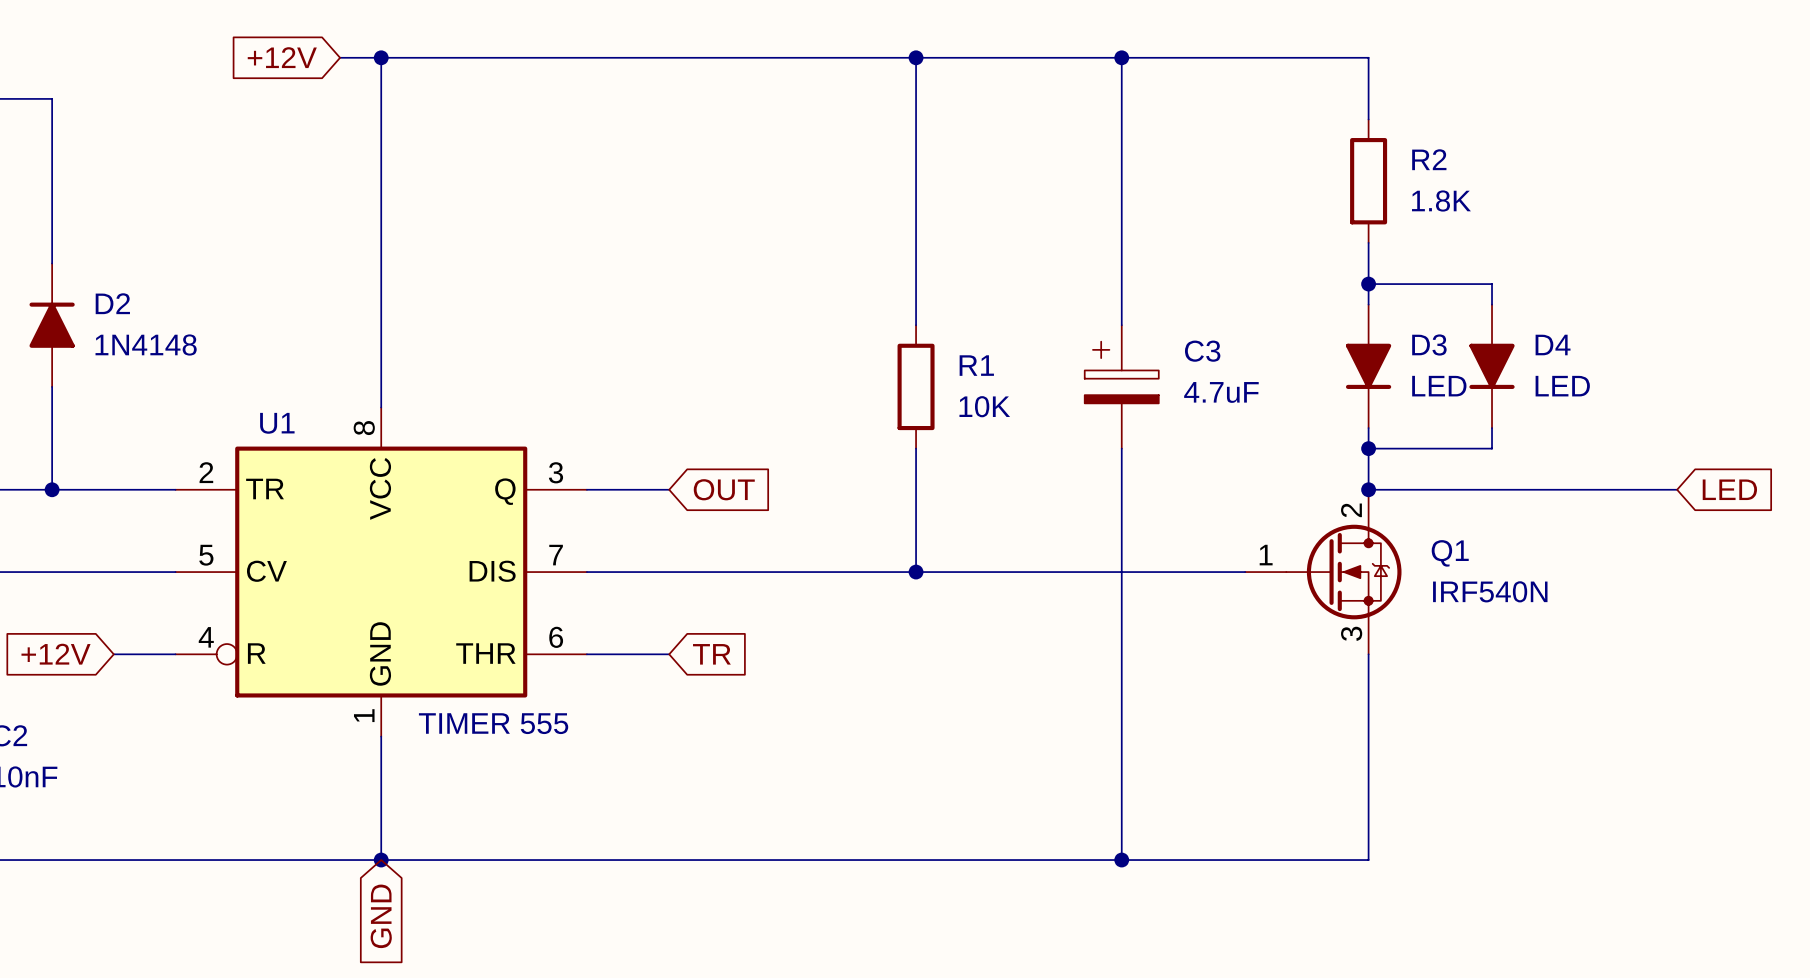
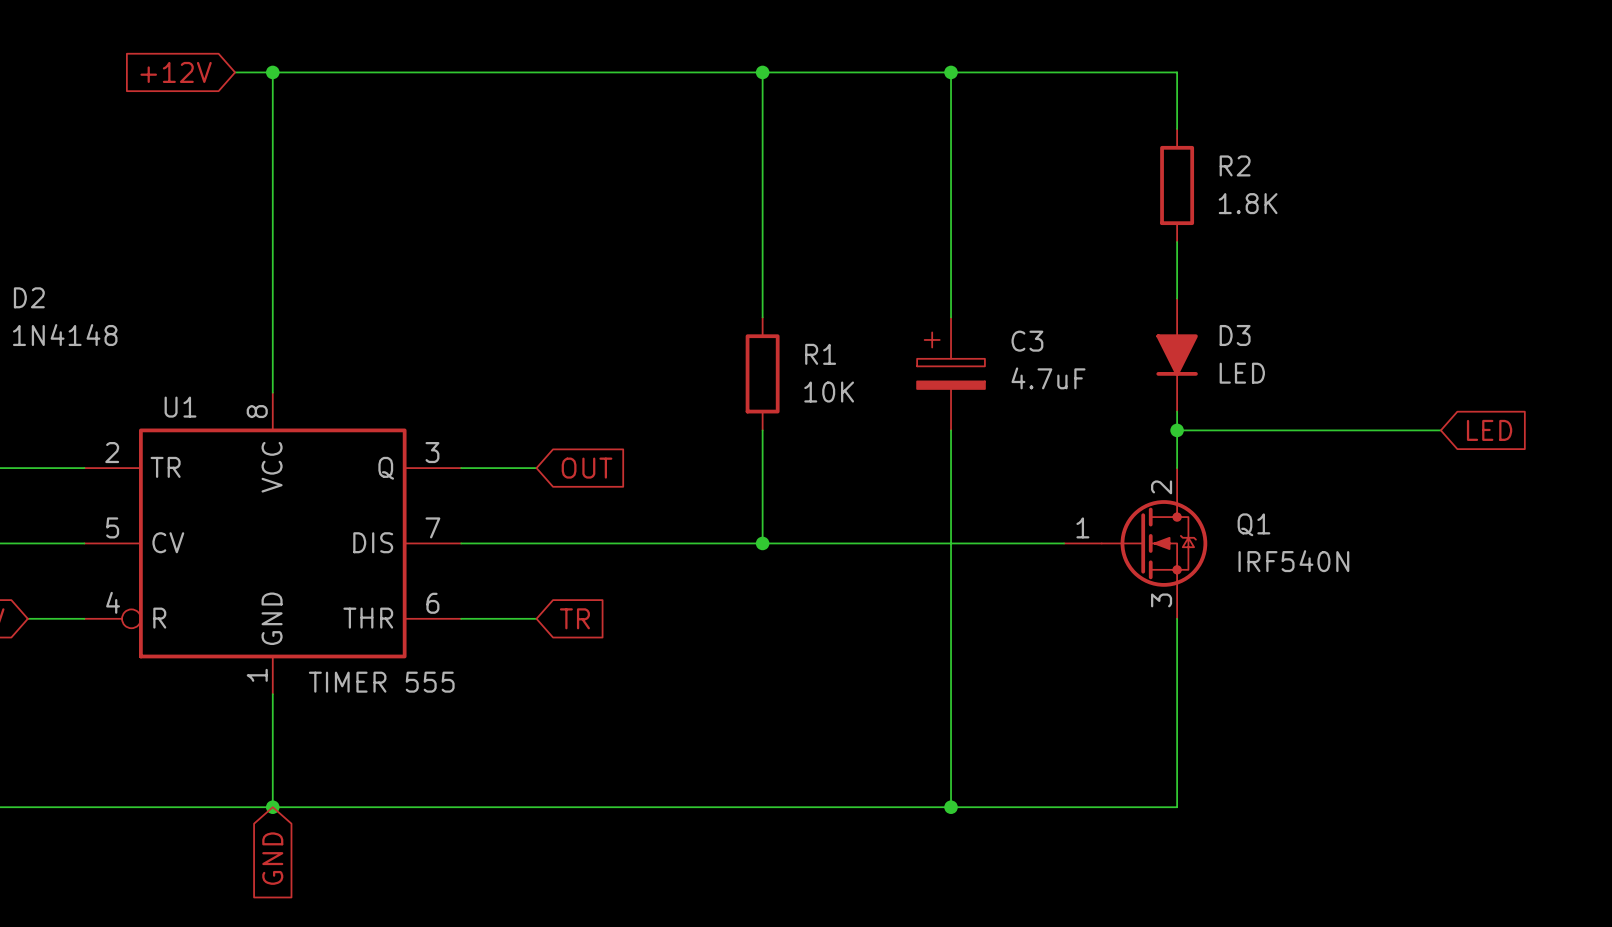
wire: (1368, 284) (1492, 284) (1492, 304) -> none
junction: (1368, 284) -> none
D4: LED (1492, 366) -> none
wire: (1492, 428) (1492, 448) -> (1440, 430) (1290, 430)
wire: (1368, 489) (1677, 489) -> none
junction: (1368, 489) -> none
global label position: LED (1729, 489) -> LED (1489, 430)

